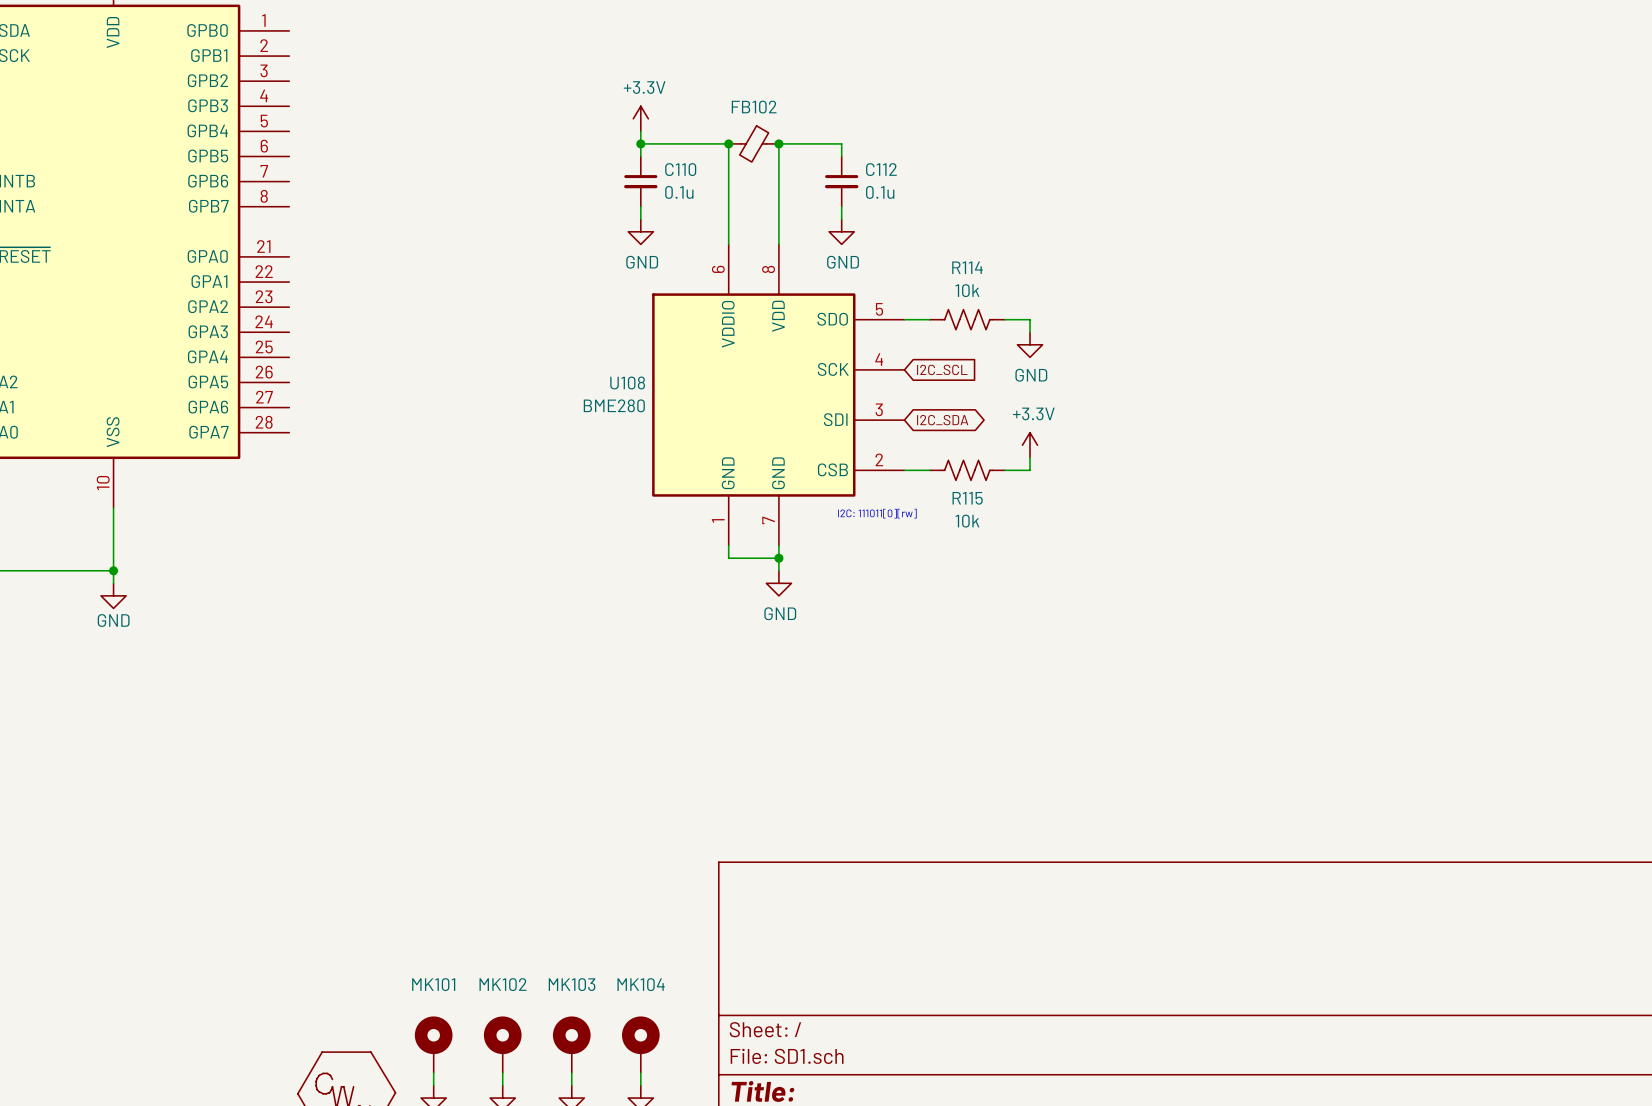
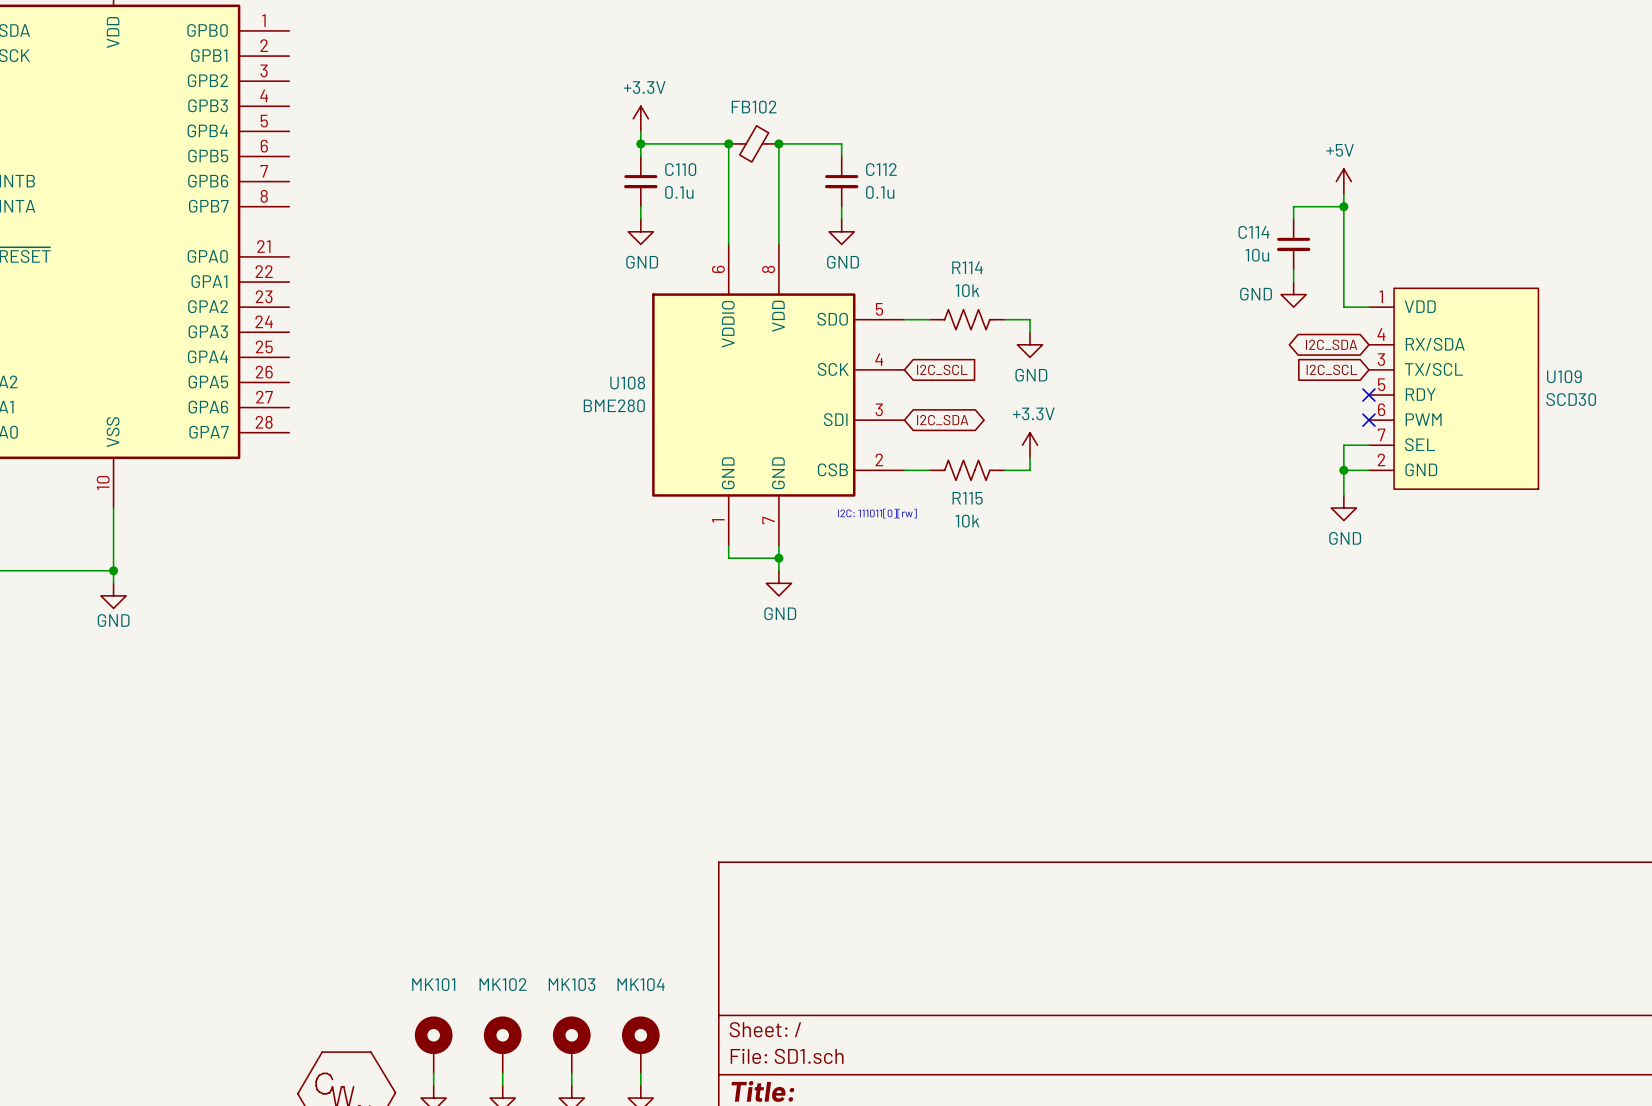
power symbol: none -> +5V (1343, 181)
wire: none -> (1343, 194) (1343, 307) (1368, 307)
wire: none -> (1343, 206) (1293, 206) (1293, 219)
junction: none -> (1343, 206)
C114: none -> 10u (1293, 244)
wire: none -> (1293, 269) (1293, 282)
power symbol: none -> GND (1293, 294)
global label: none -> I2C_SDA (1331, 344)
global label: none -> I2C_SCL (1331, 369)
U109: none -> SCD30 (1453, 388)
no-connect mark: none -> (1368, 395)
no-connect mark: none -> (1368, 420)
wire: none -> (1368, 445) (1343, 445) (1343, 495)
wire: none -> (1343, 470) (1368, 470)
junction: none -> (1343, 470)
power symbol: none -> GND (1343, 508)

